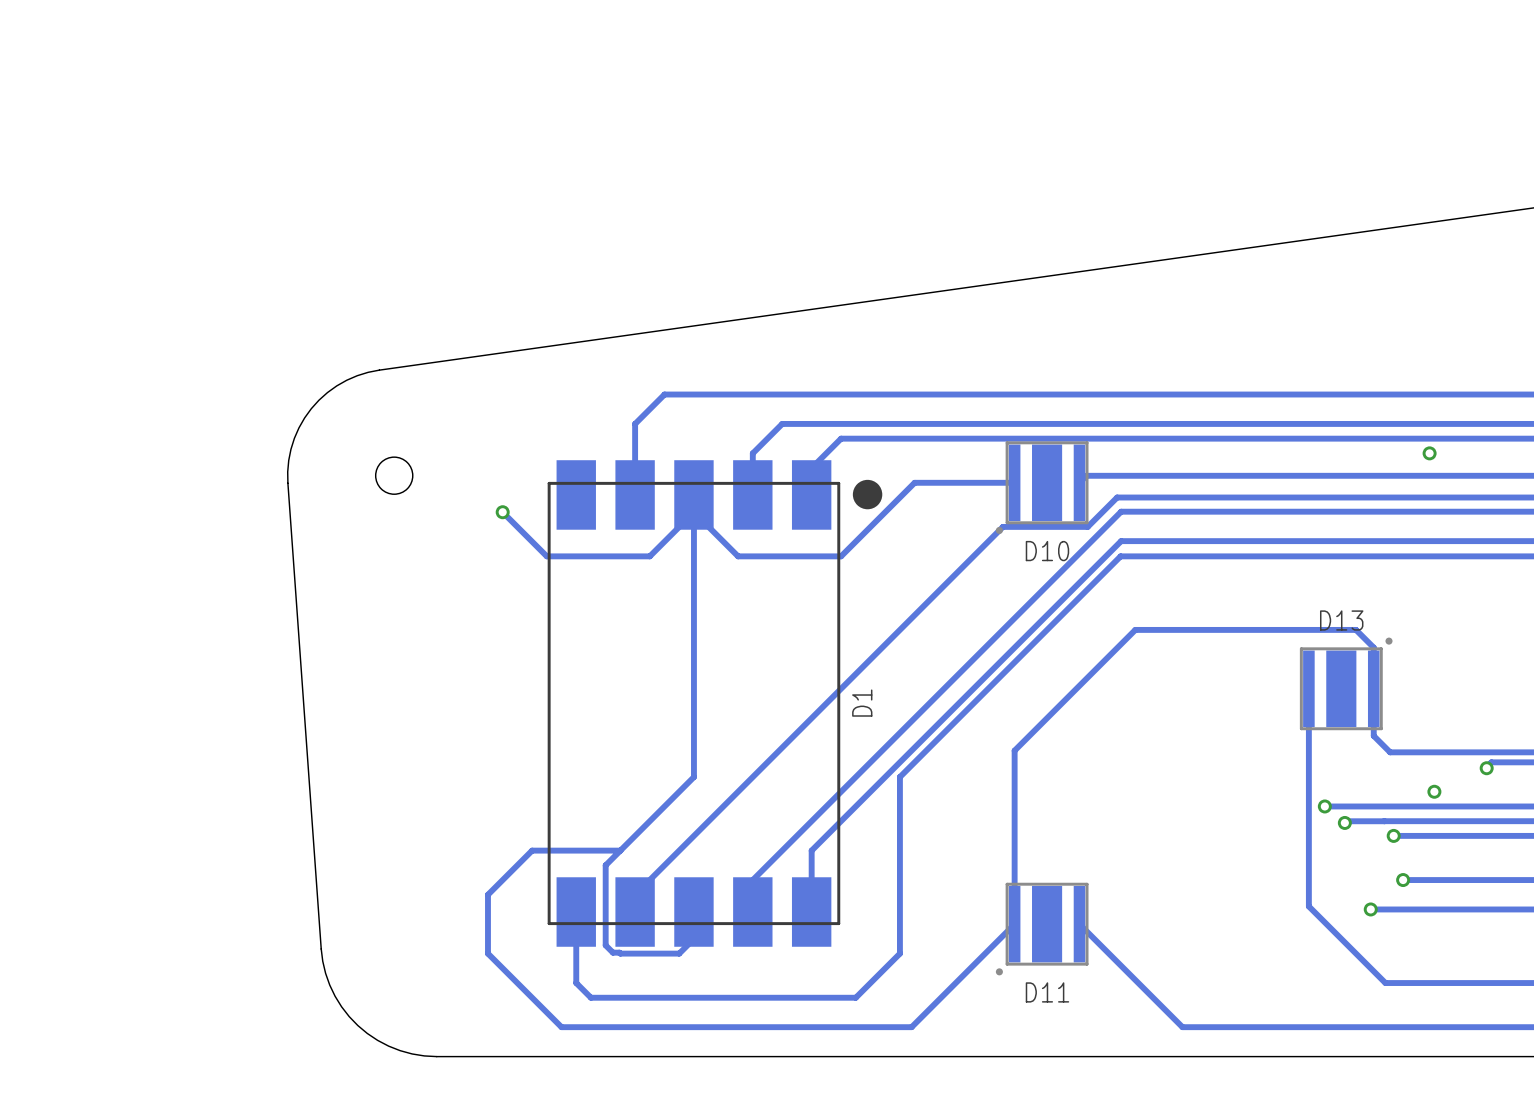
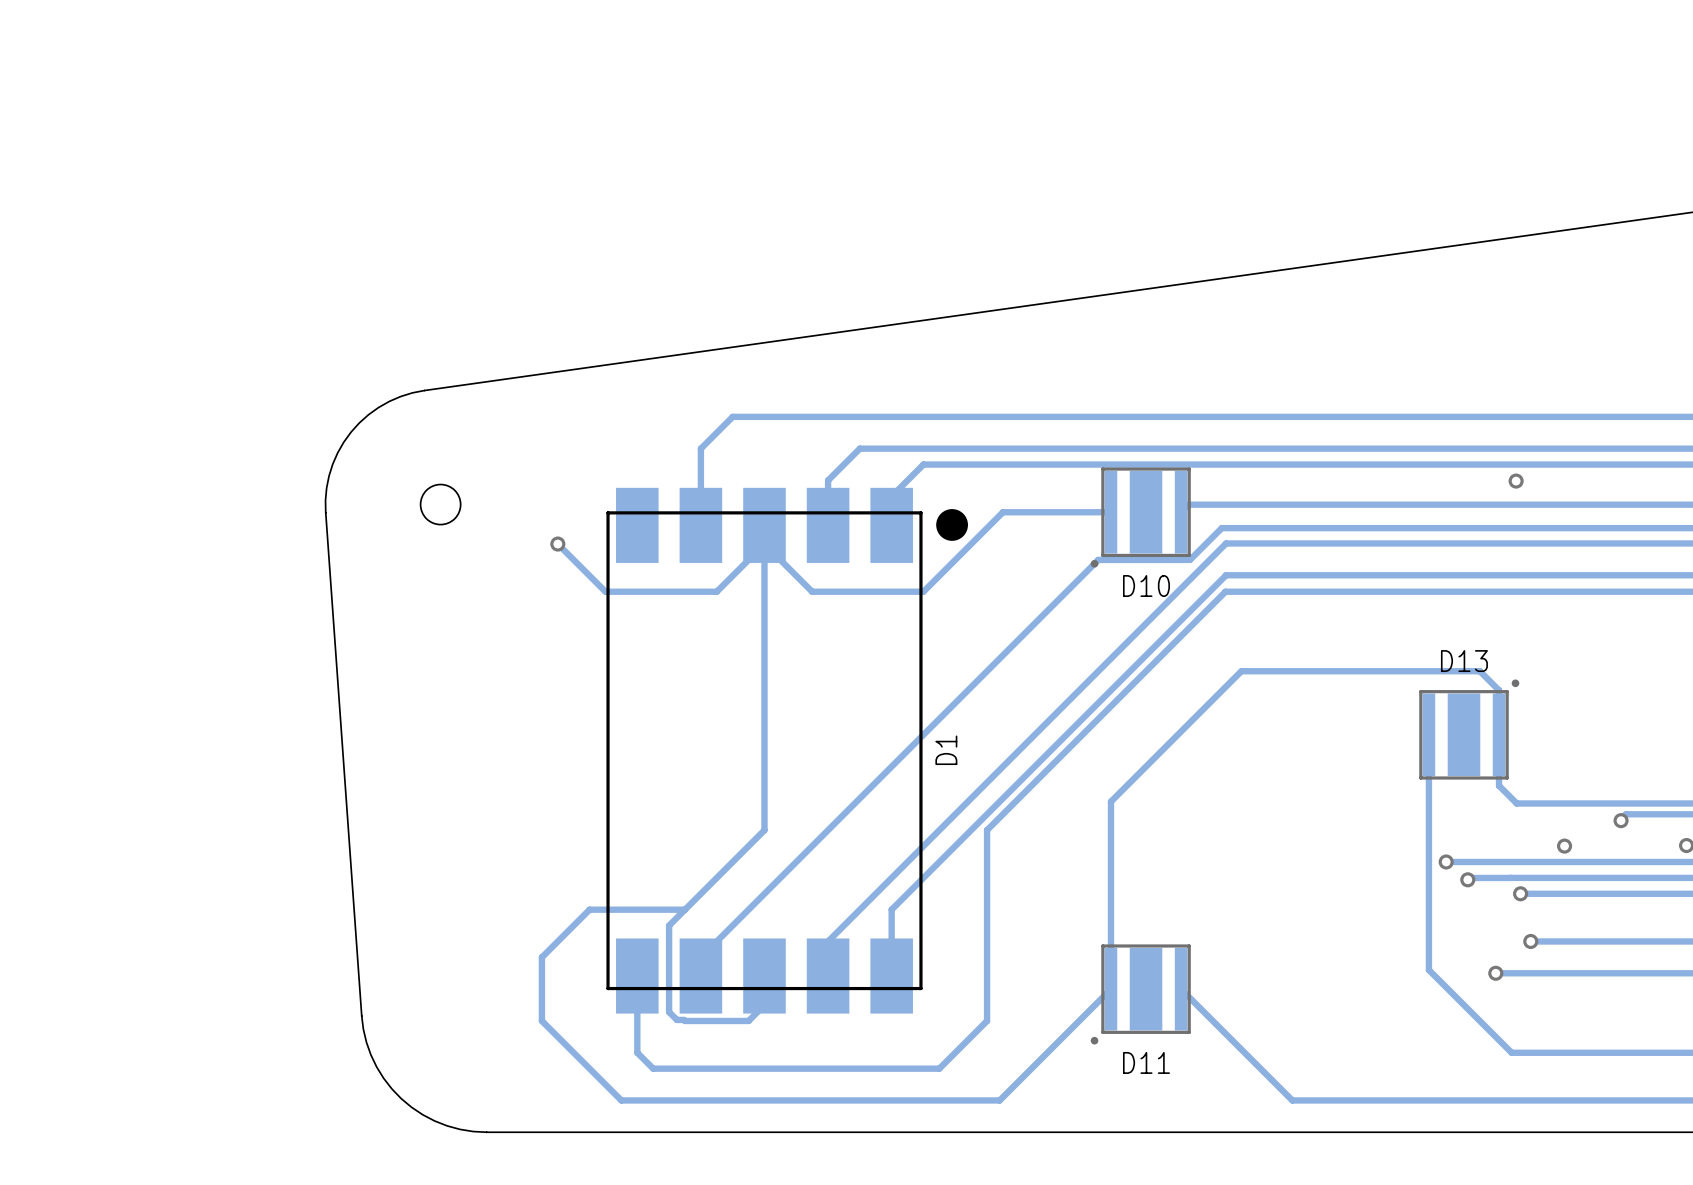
via position: (1429, 453) -> (1516, 481)

